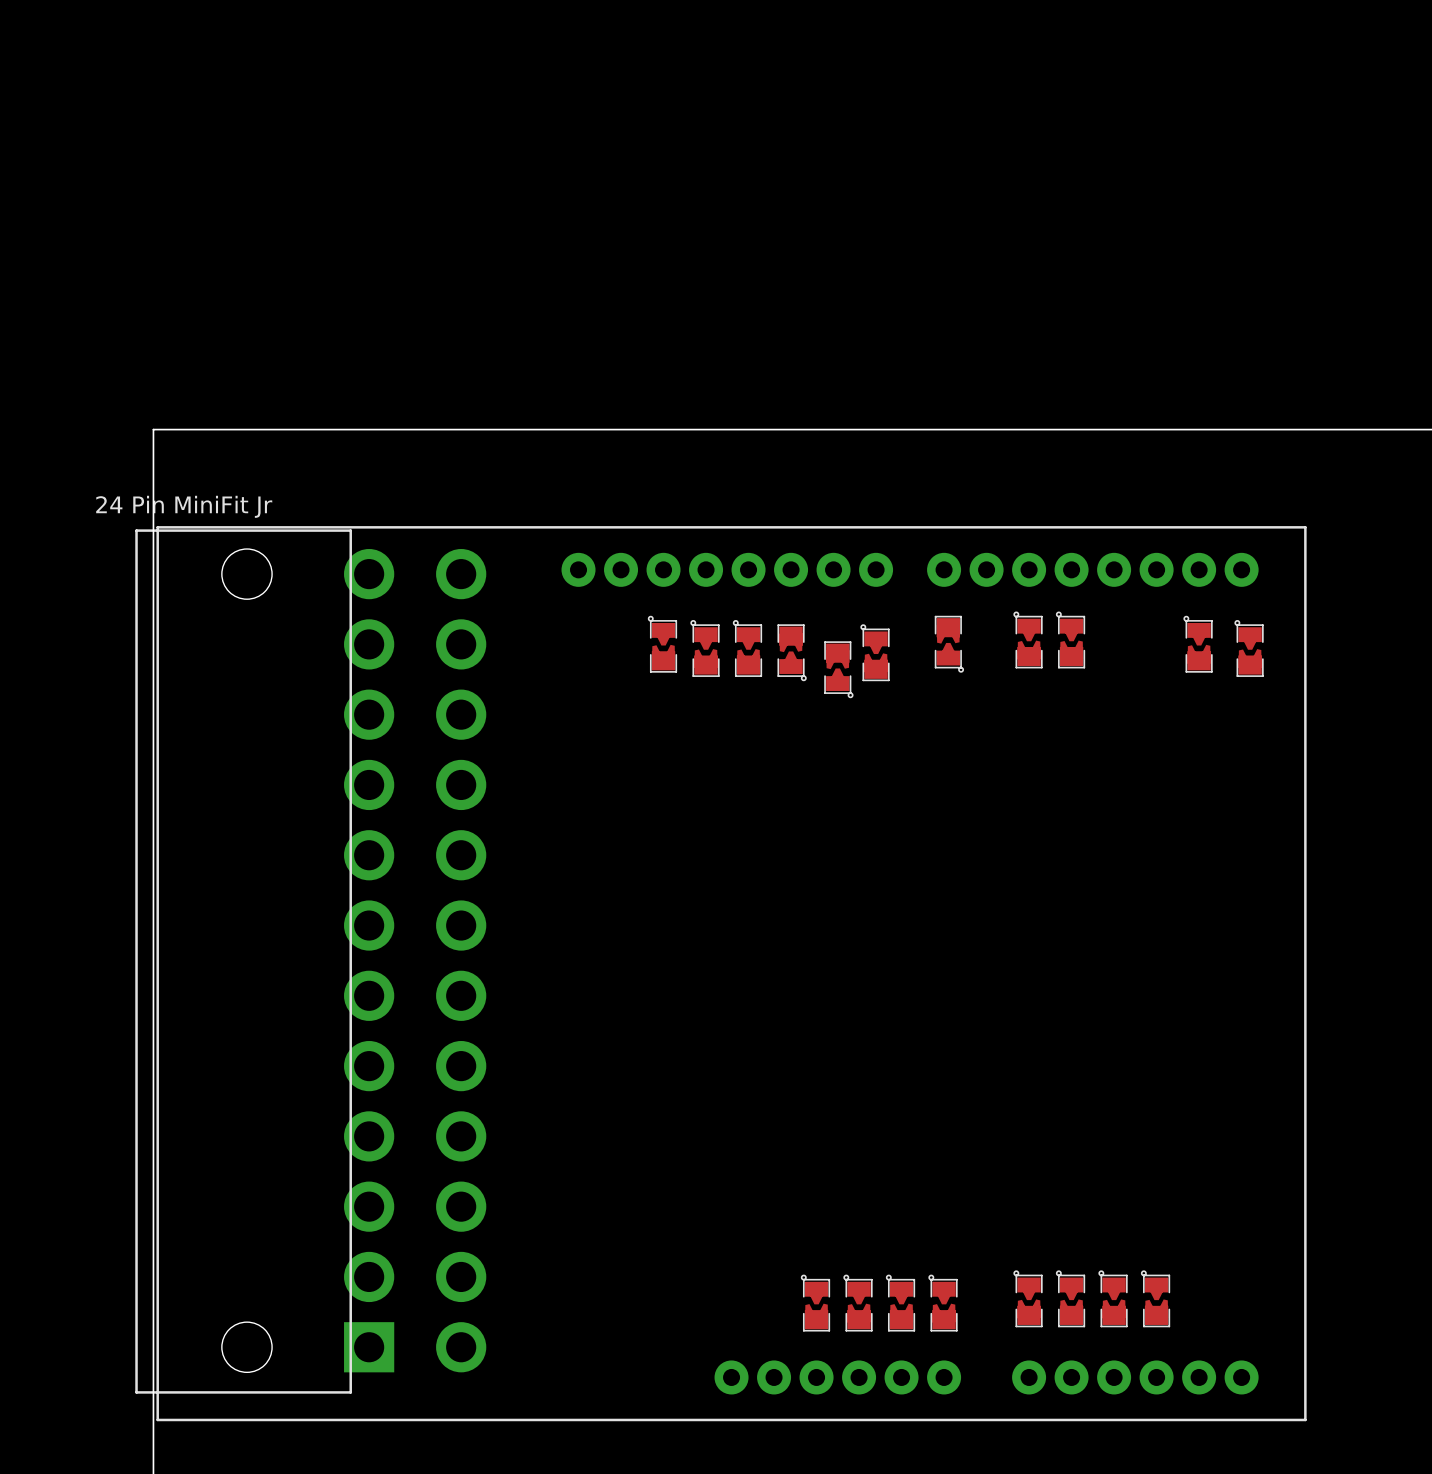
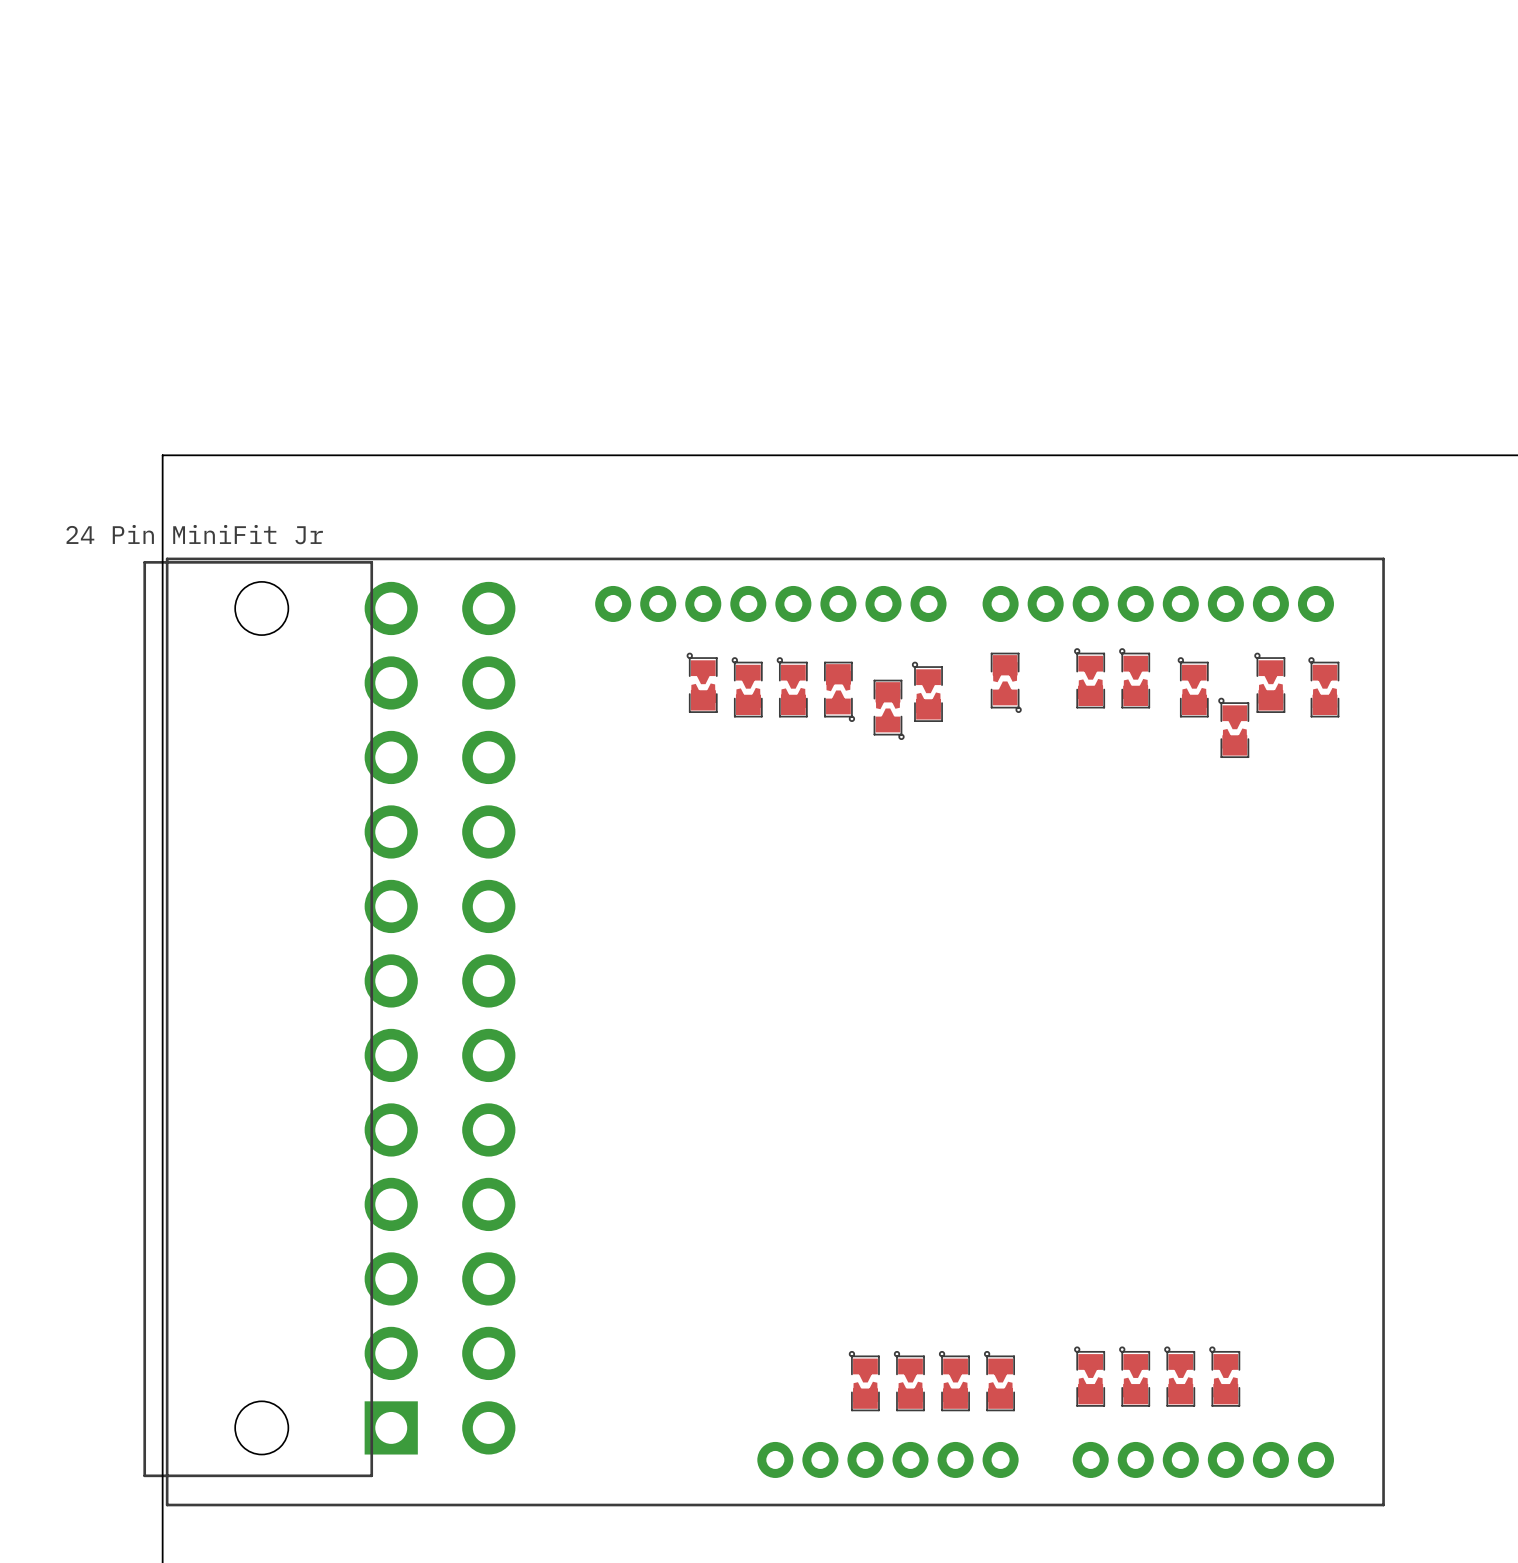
part: none -> (1193, 687)
part: none -> (1233, 727)

